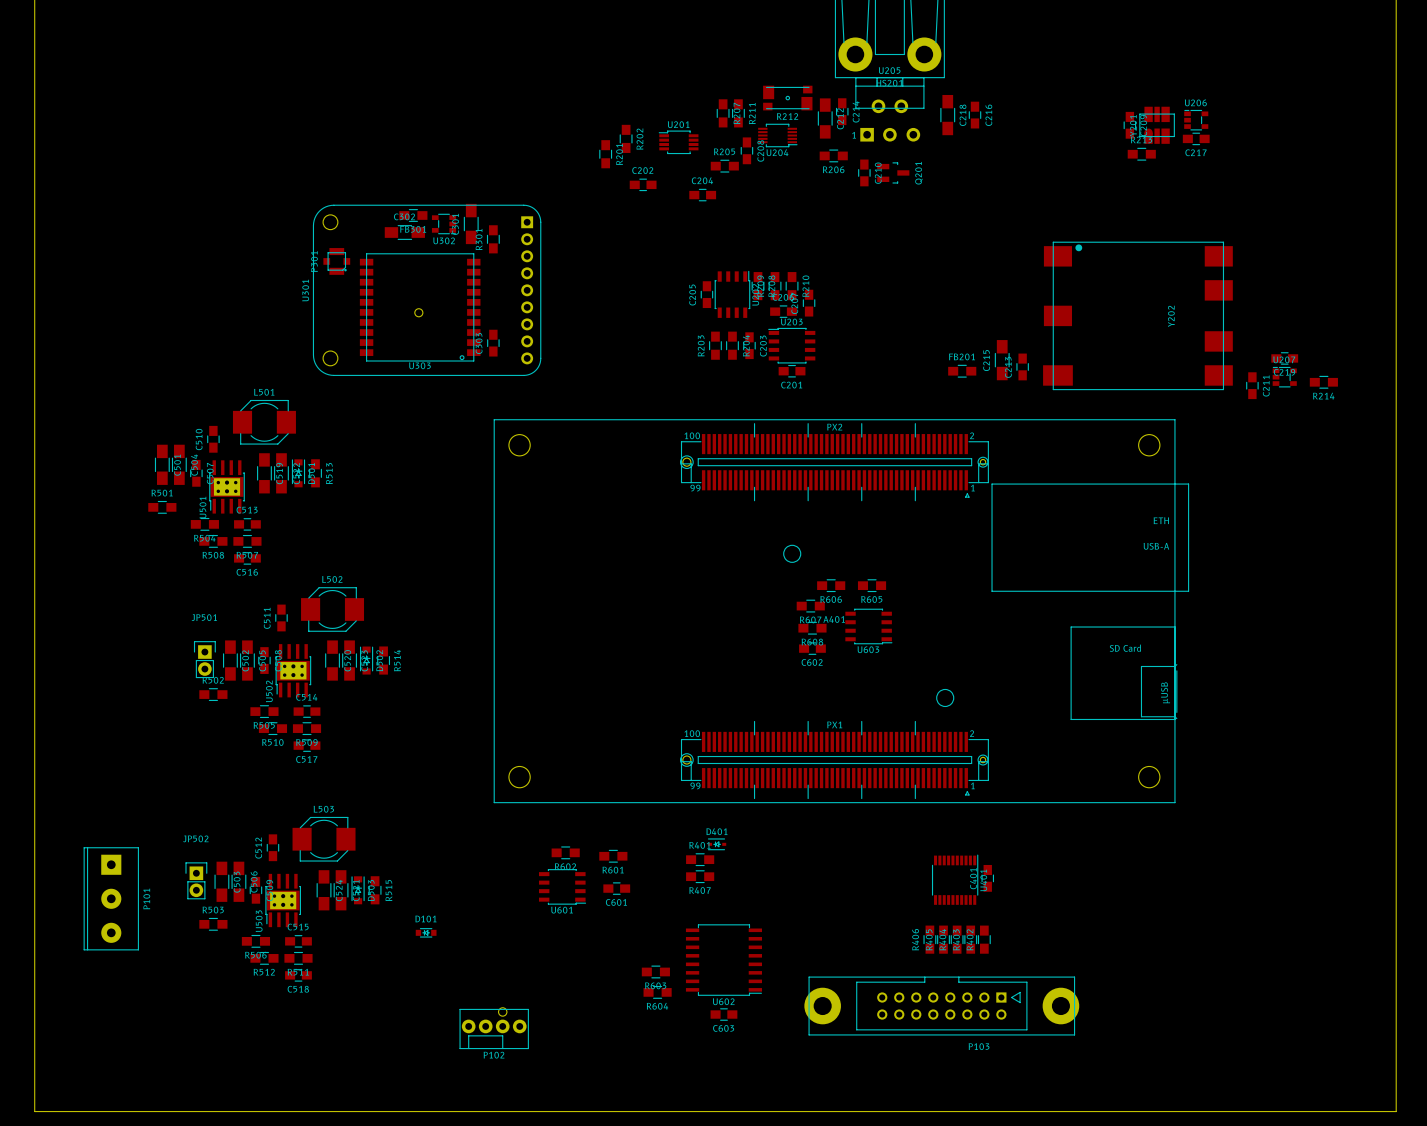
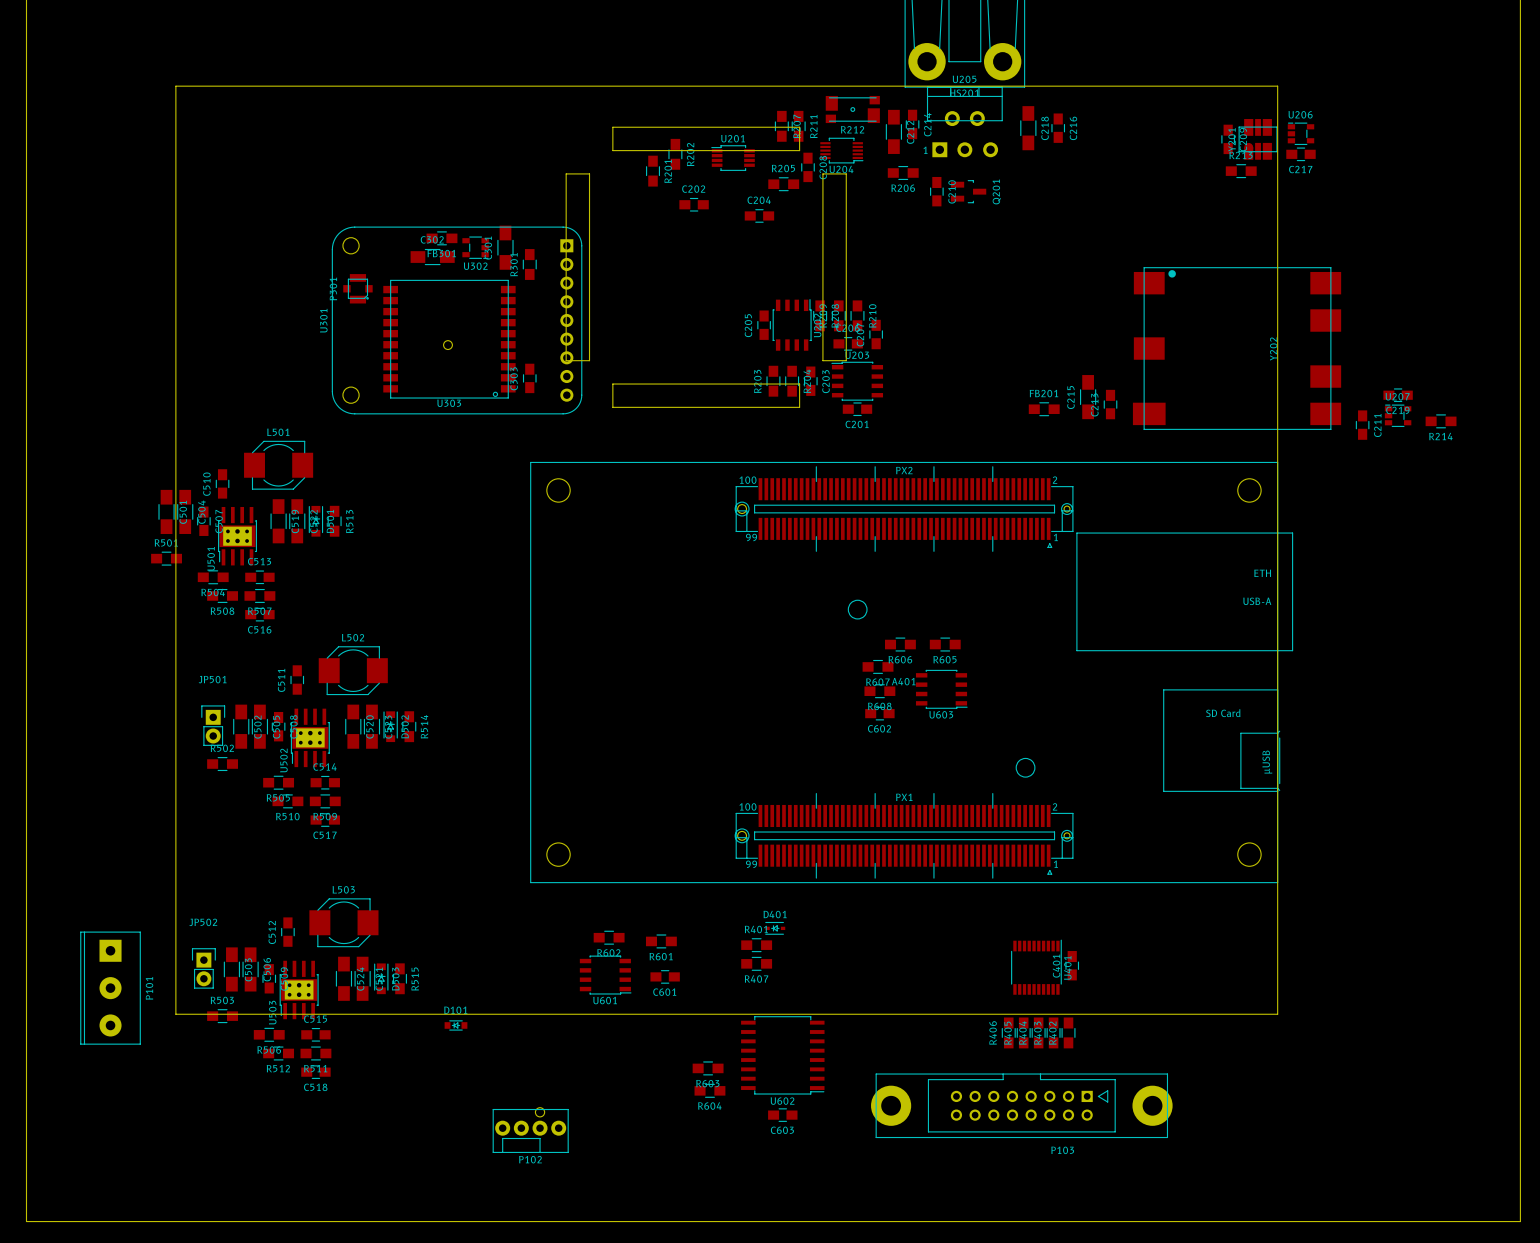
board edge: none -> (175, 86) (175, 1014) (1277, 1014) (1277, 86) (175, 86)
board edge: none -> (612, 127) (612, 150) (799, 150) (799, 127) (612, 127)
board edge: none -> (566, 173) (566, 360) (589, 360) (589, 173) (566, 173)
board edge: none -> (822, 173) (846, 173) (846, 360) (822, 360) (822, 173)
board edge: none -> (612, 384) (799, 384) (799, 407) (612, 407) (612, 384)

